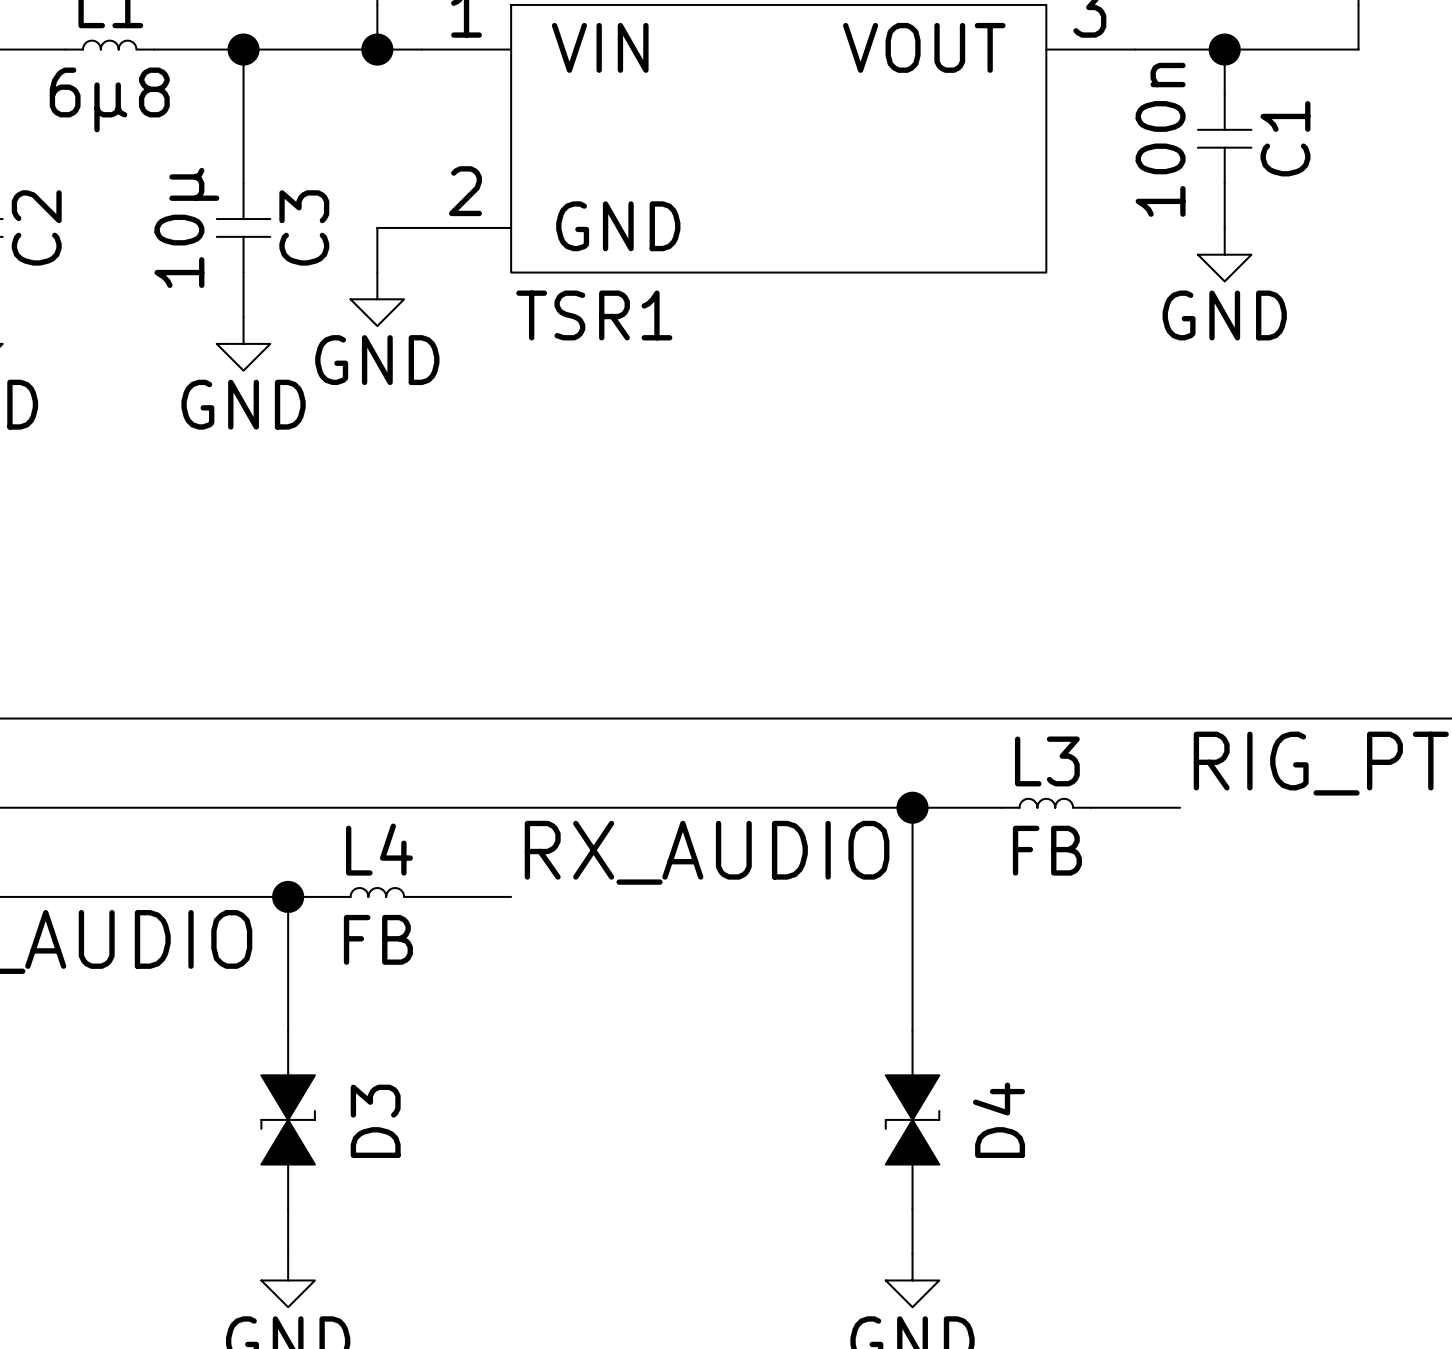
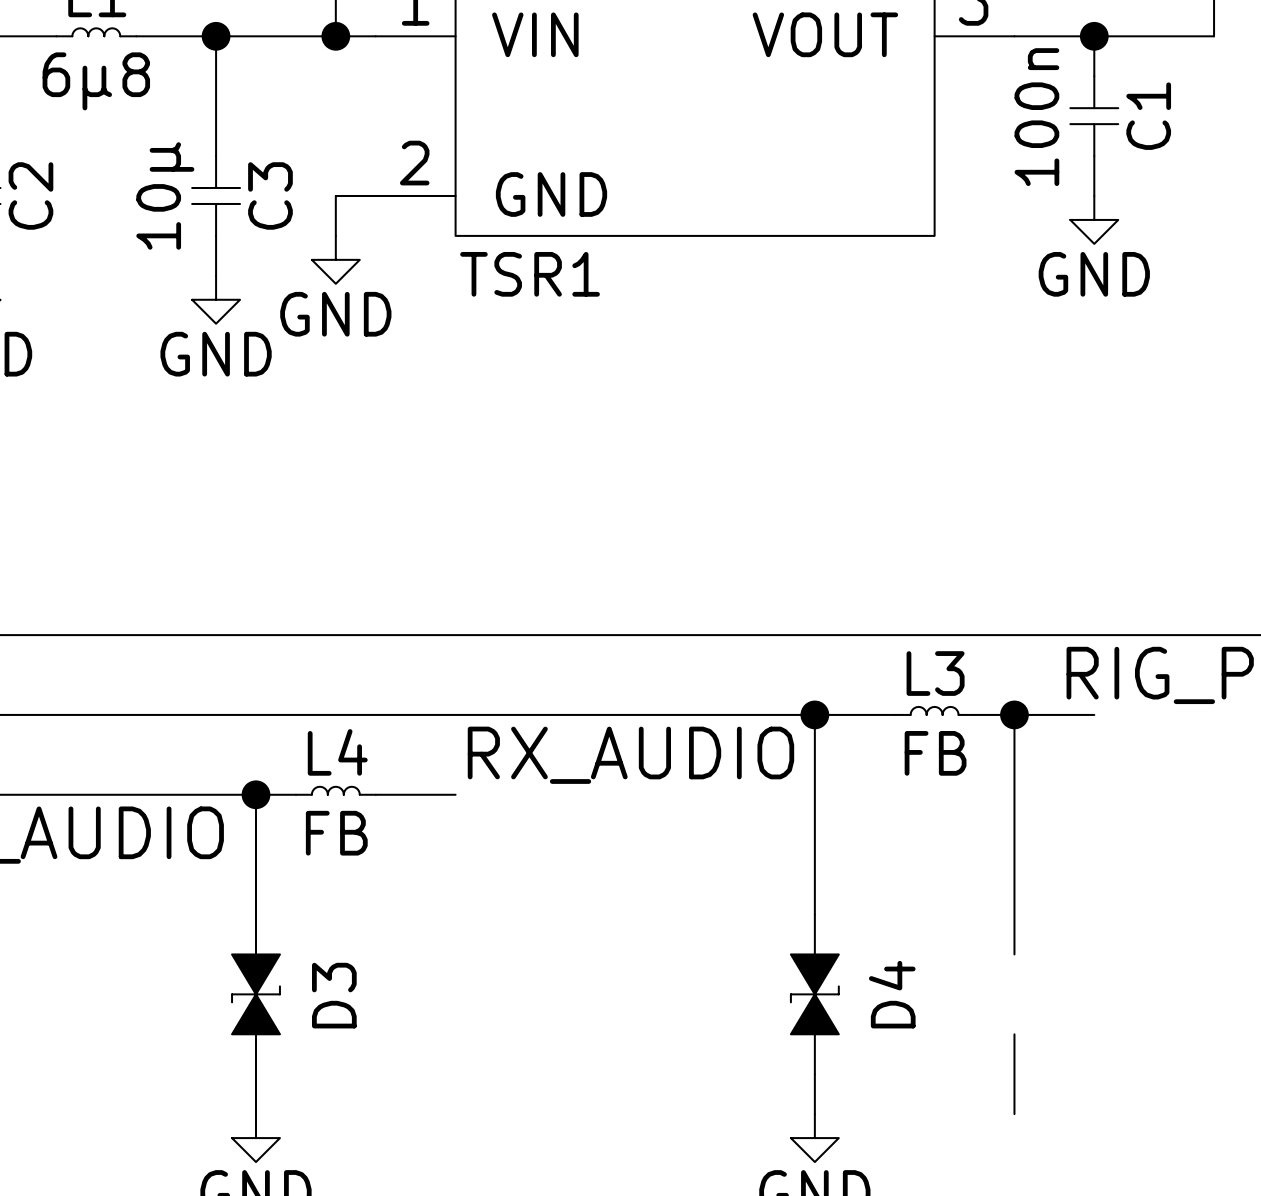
wire: none -> (1014, 714) (1014, 954)
junction: none -> (1014, 714)
wire: none -> (1054, 714) (1094, 714)
wire: none -> (1014, 1034) (1014, 1114)

